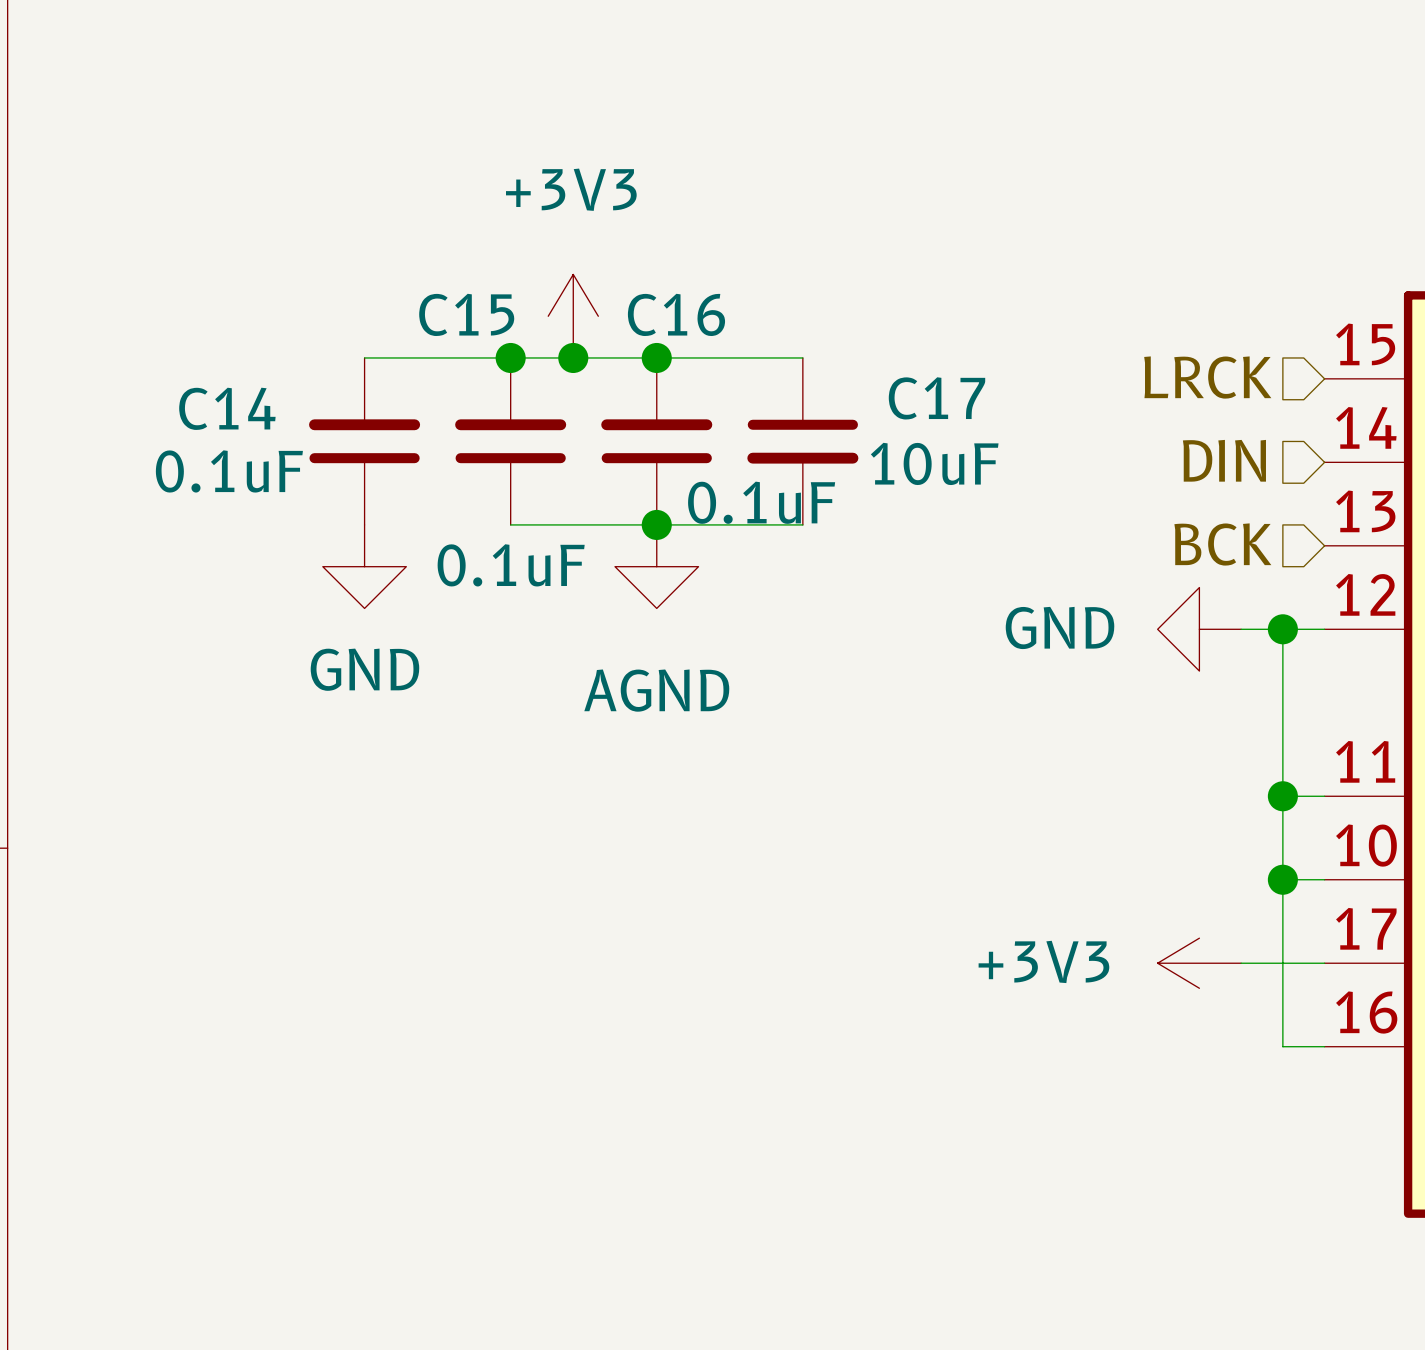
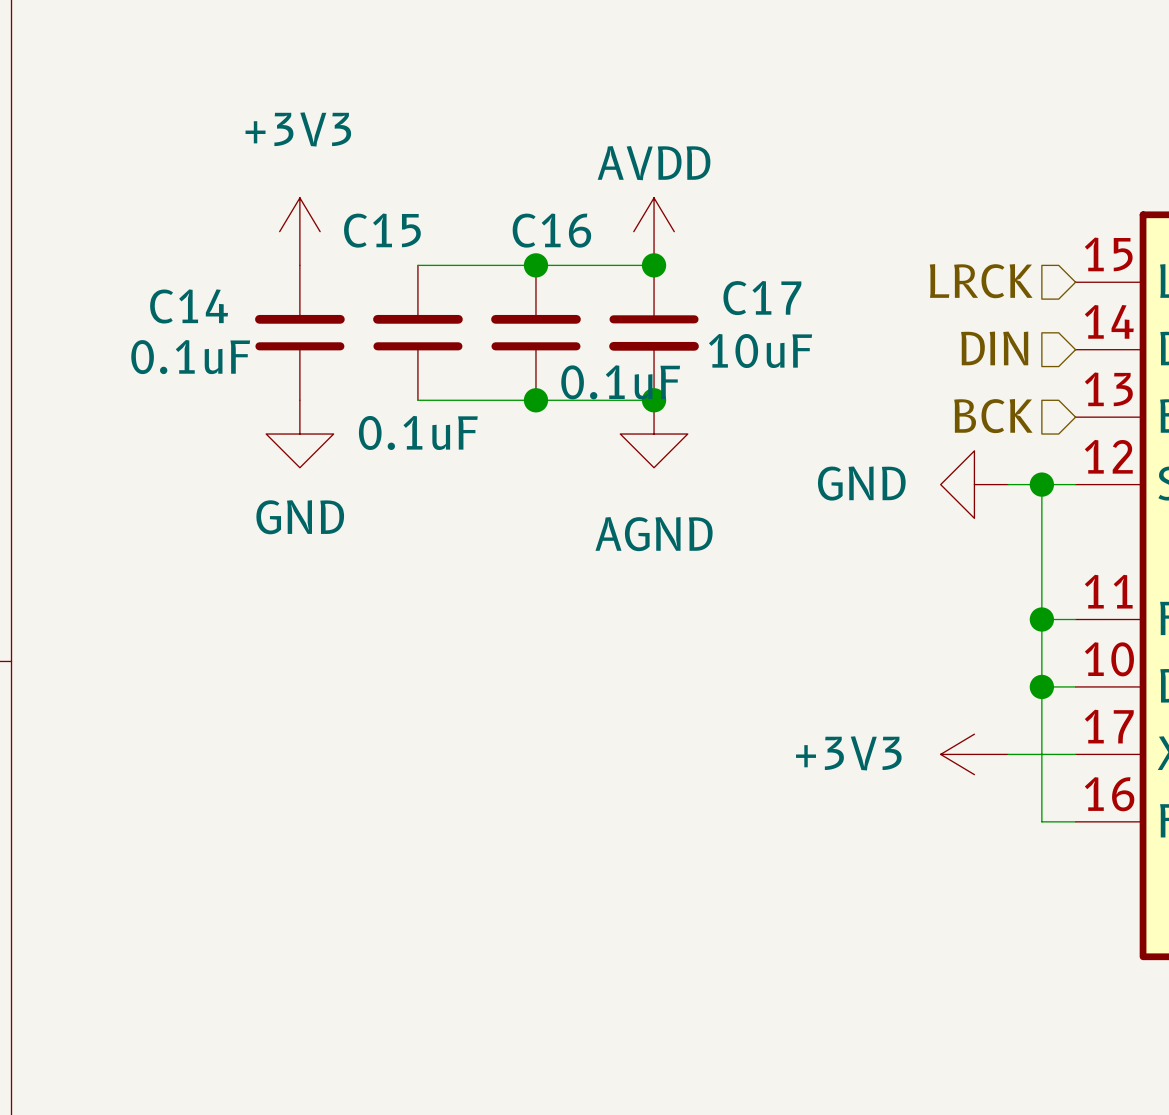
power symbol position: +3V3 (573, 316) -> +3V3 (299, 231)
power symbol: none -> AVDD (654, 231)
wire: (364, 357) (510, 357) -> none
junction: (510, 357) -> none
junction: (573, 357) -> none
junction: none -> (654, 265)
junction: none -> (654, 400)
power symbol position: AGND (656, 566) -> AGND (654, 434)

